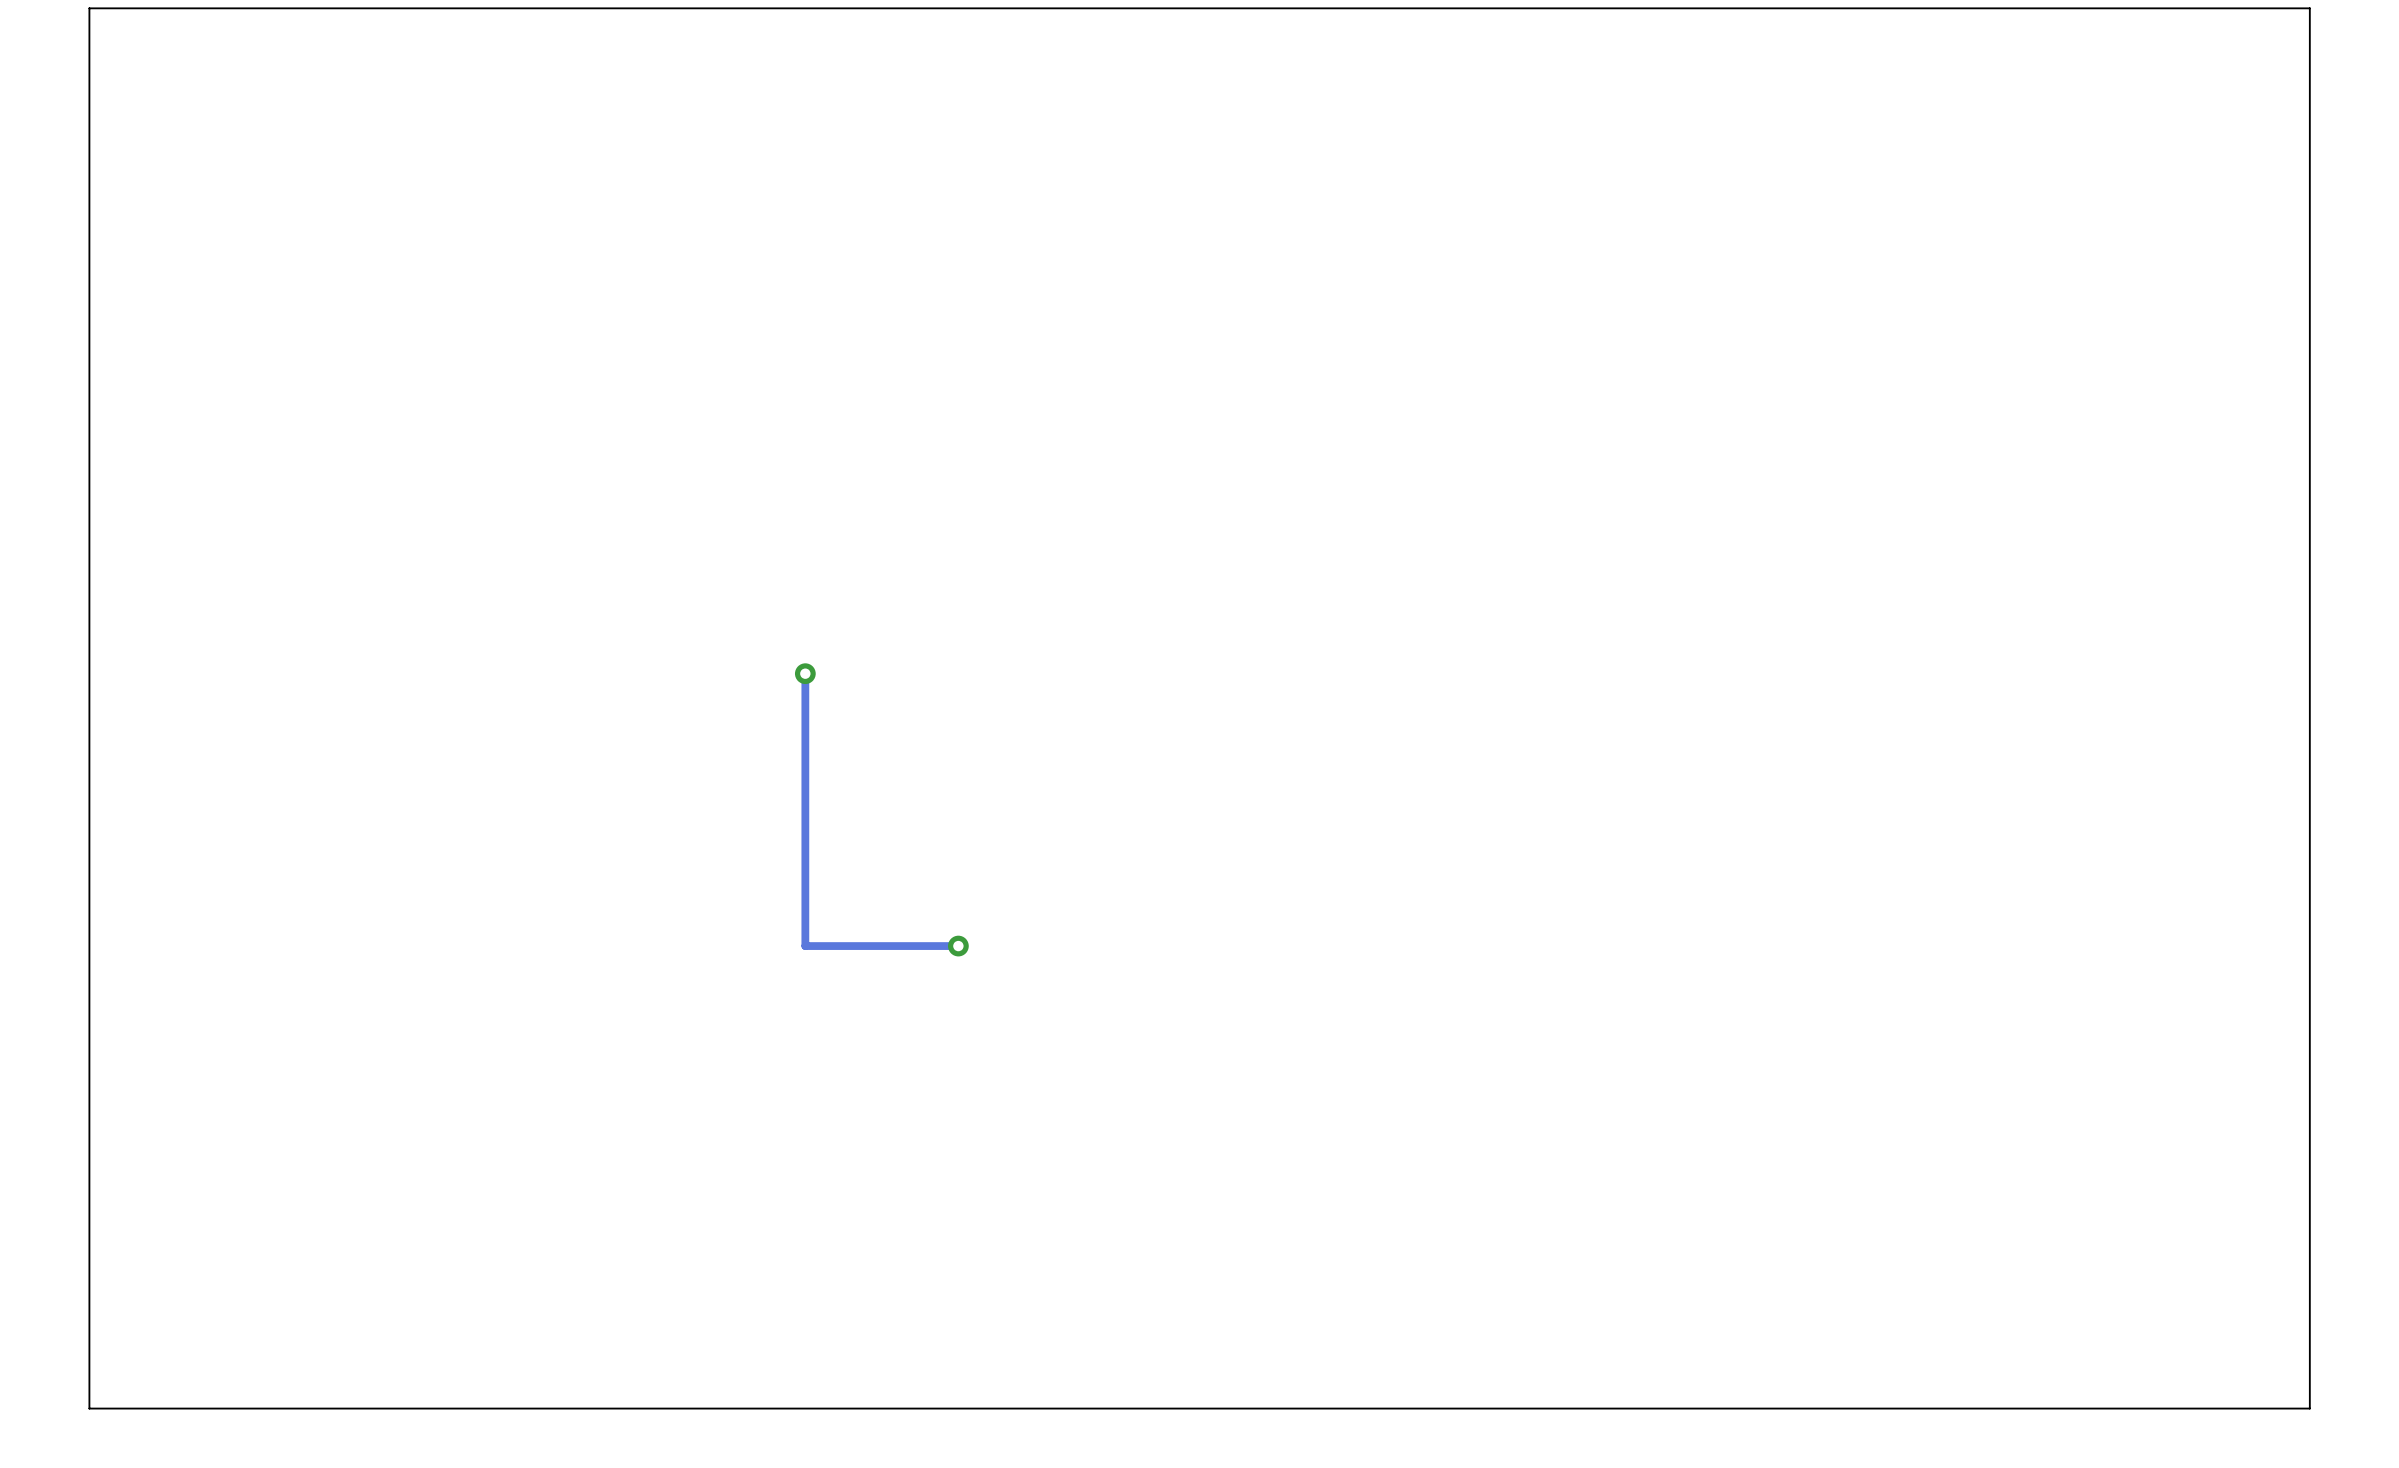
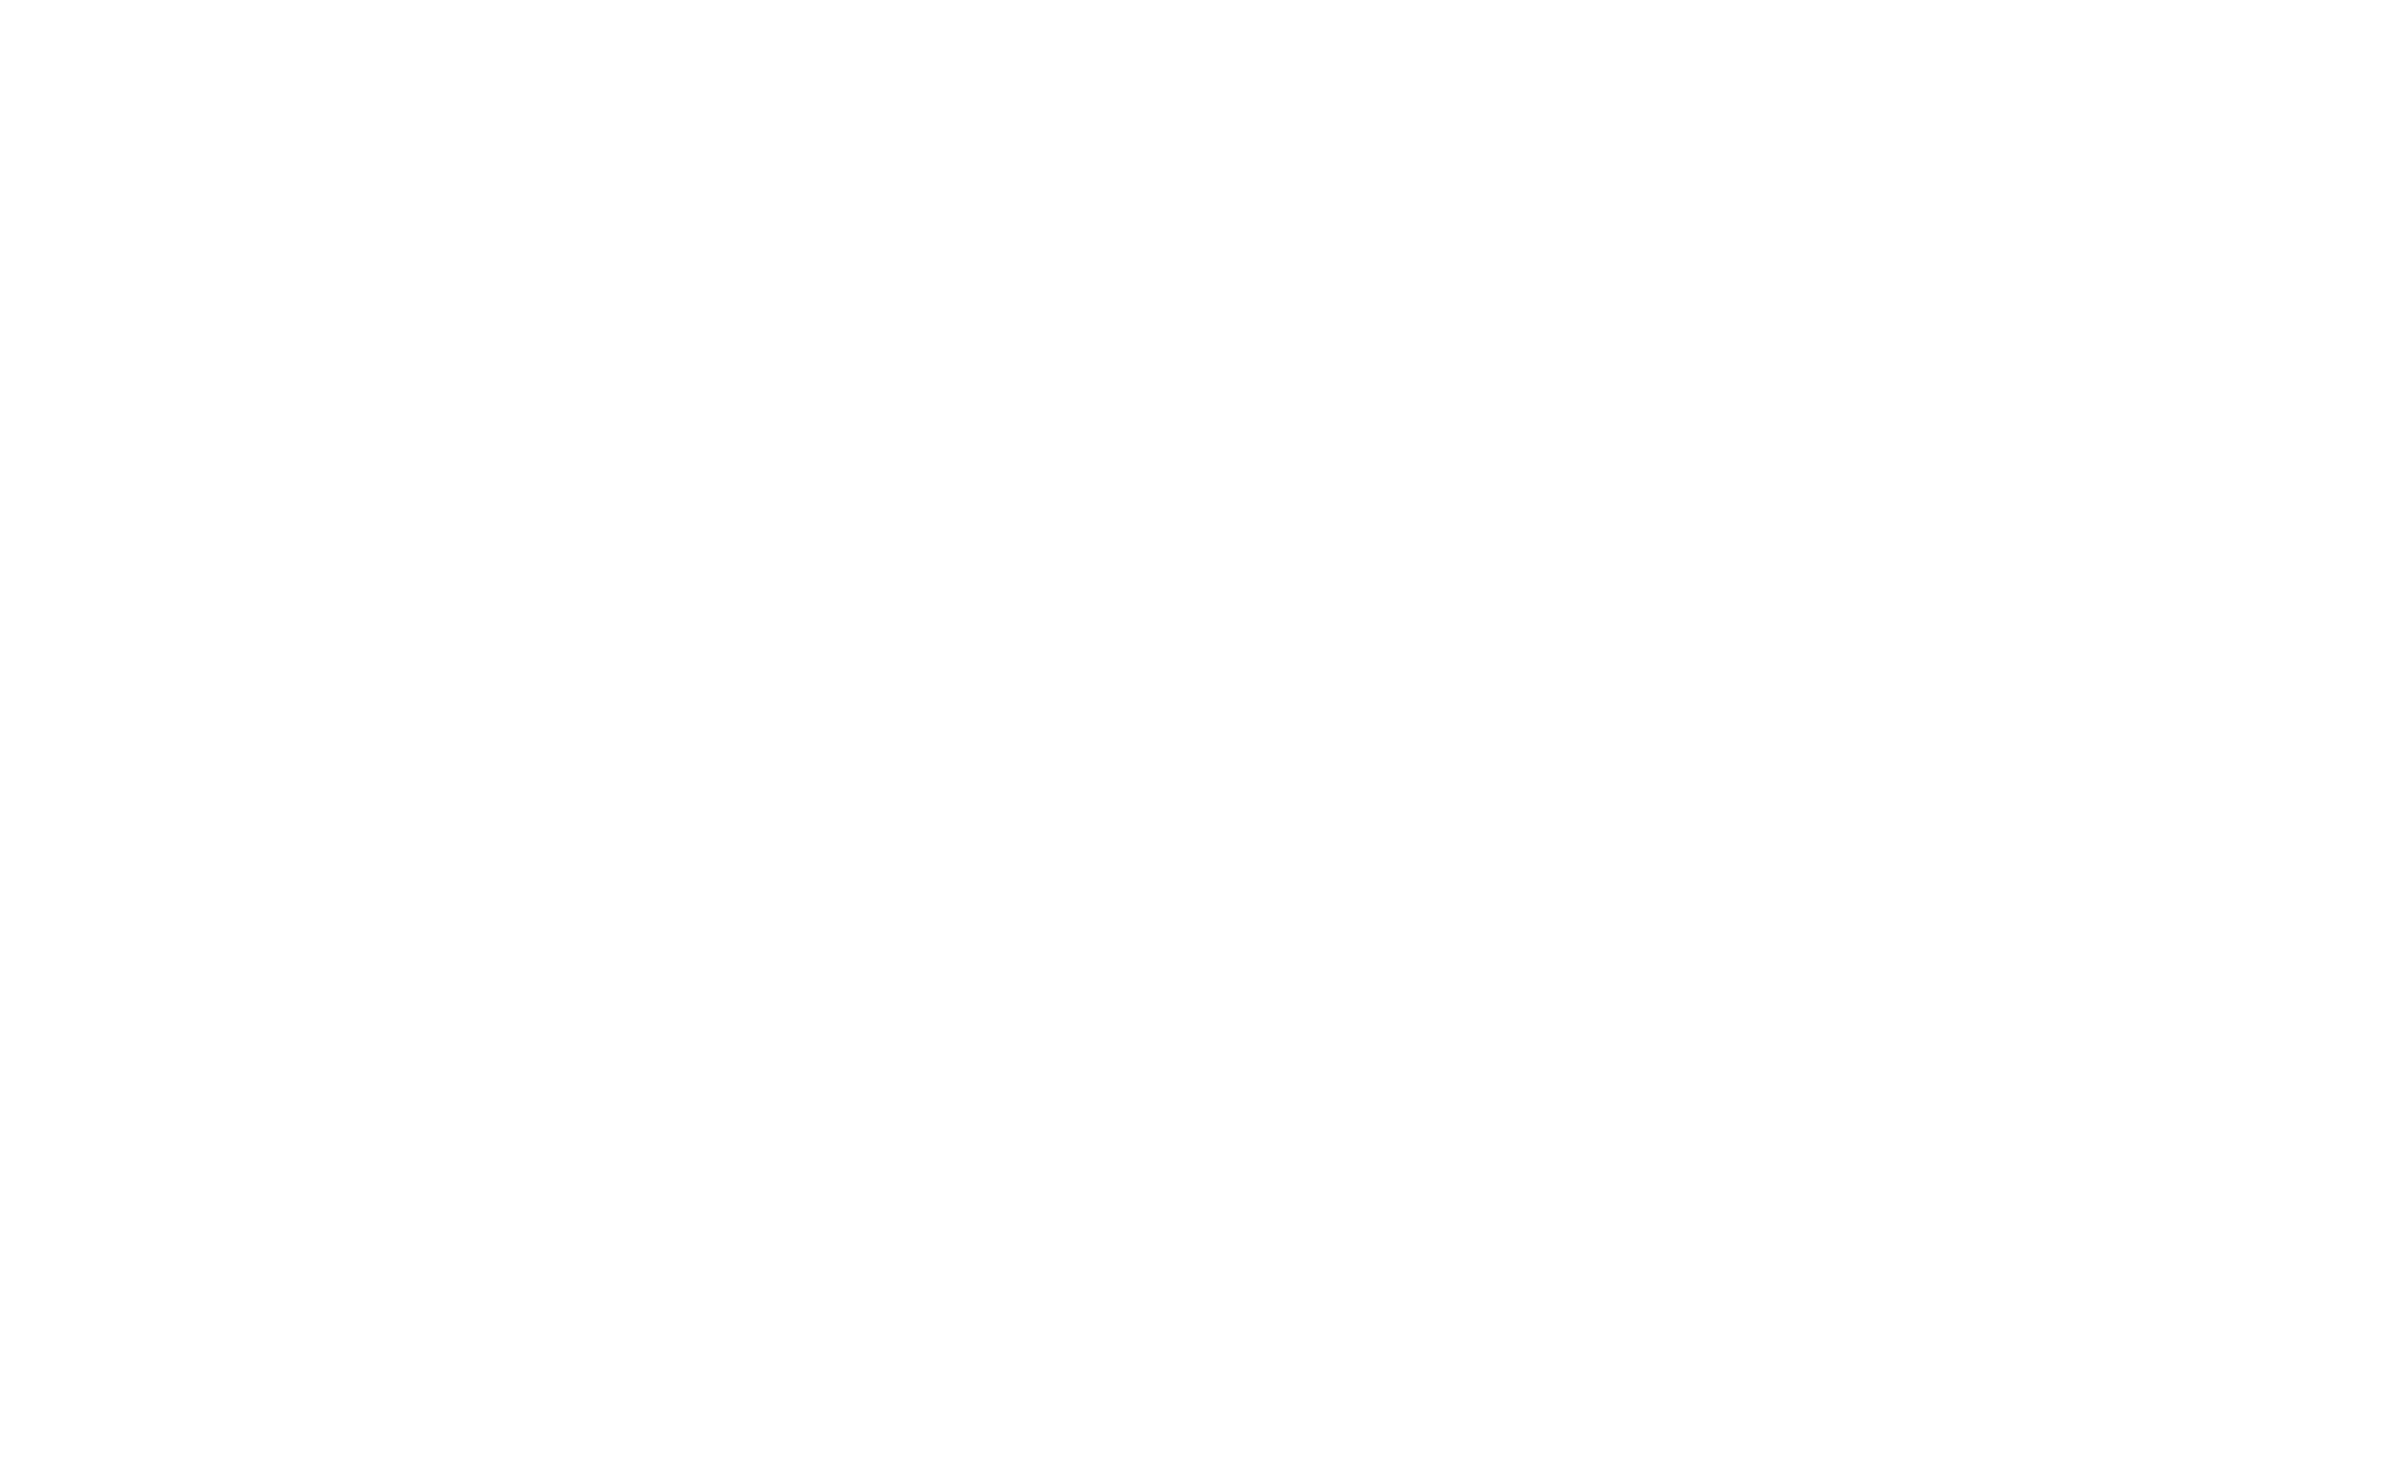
board edge: (2309, 8) (89, 8) (89, 1408) (2309, 1408) (2309, 8) -> none
part: (881, 809) -> none

